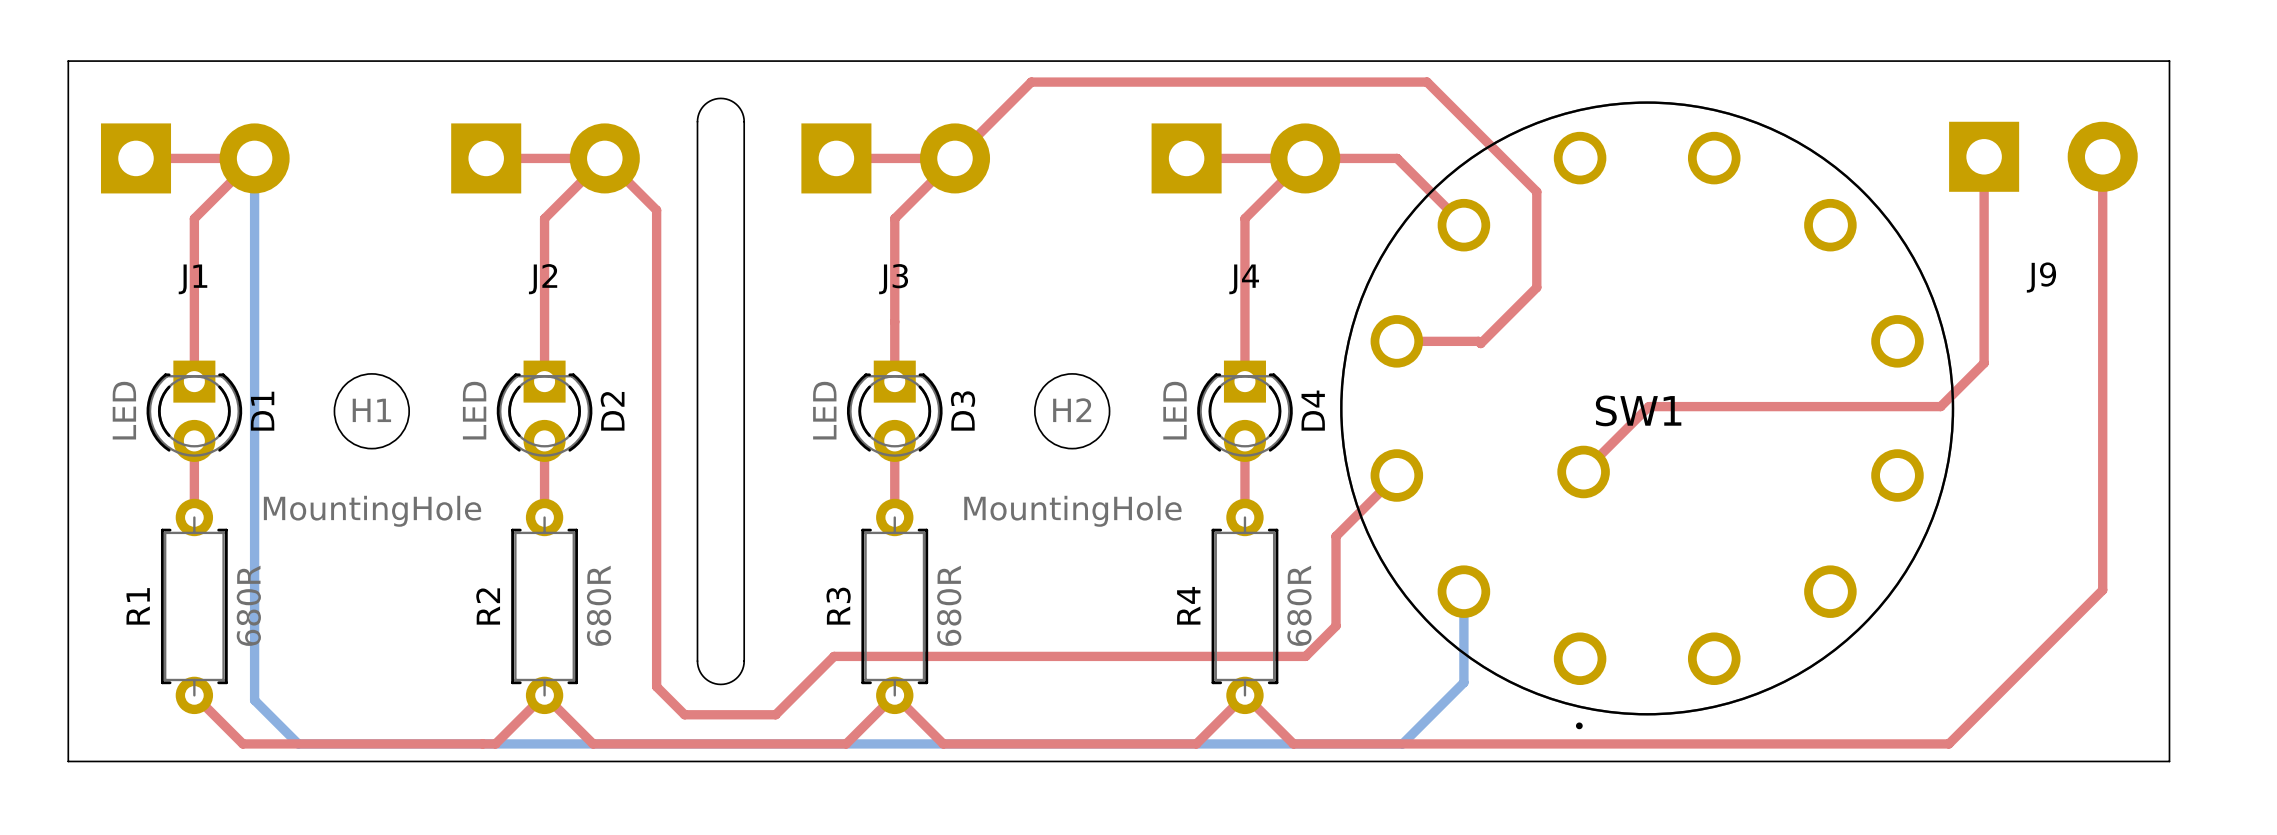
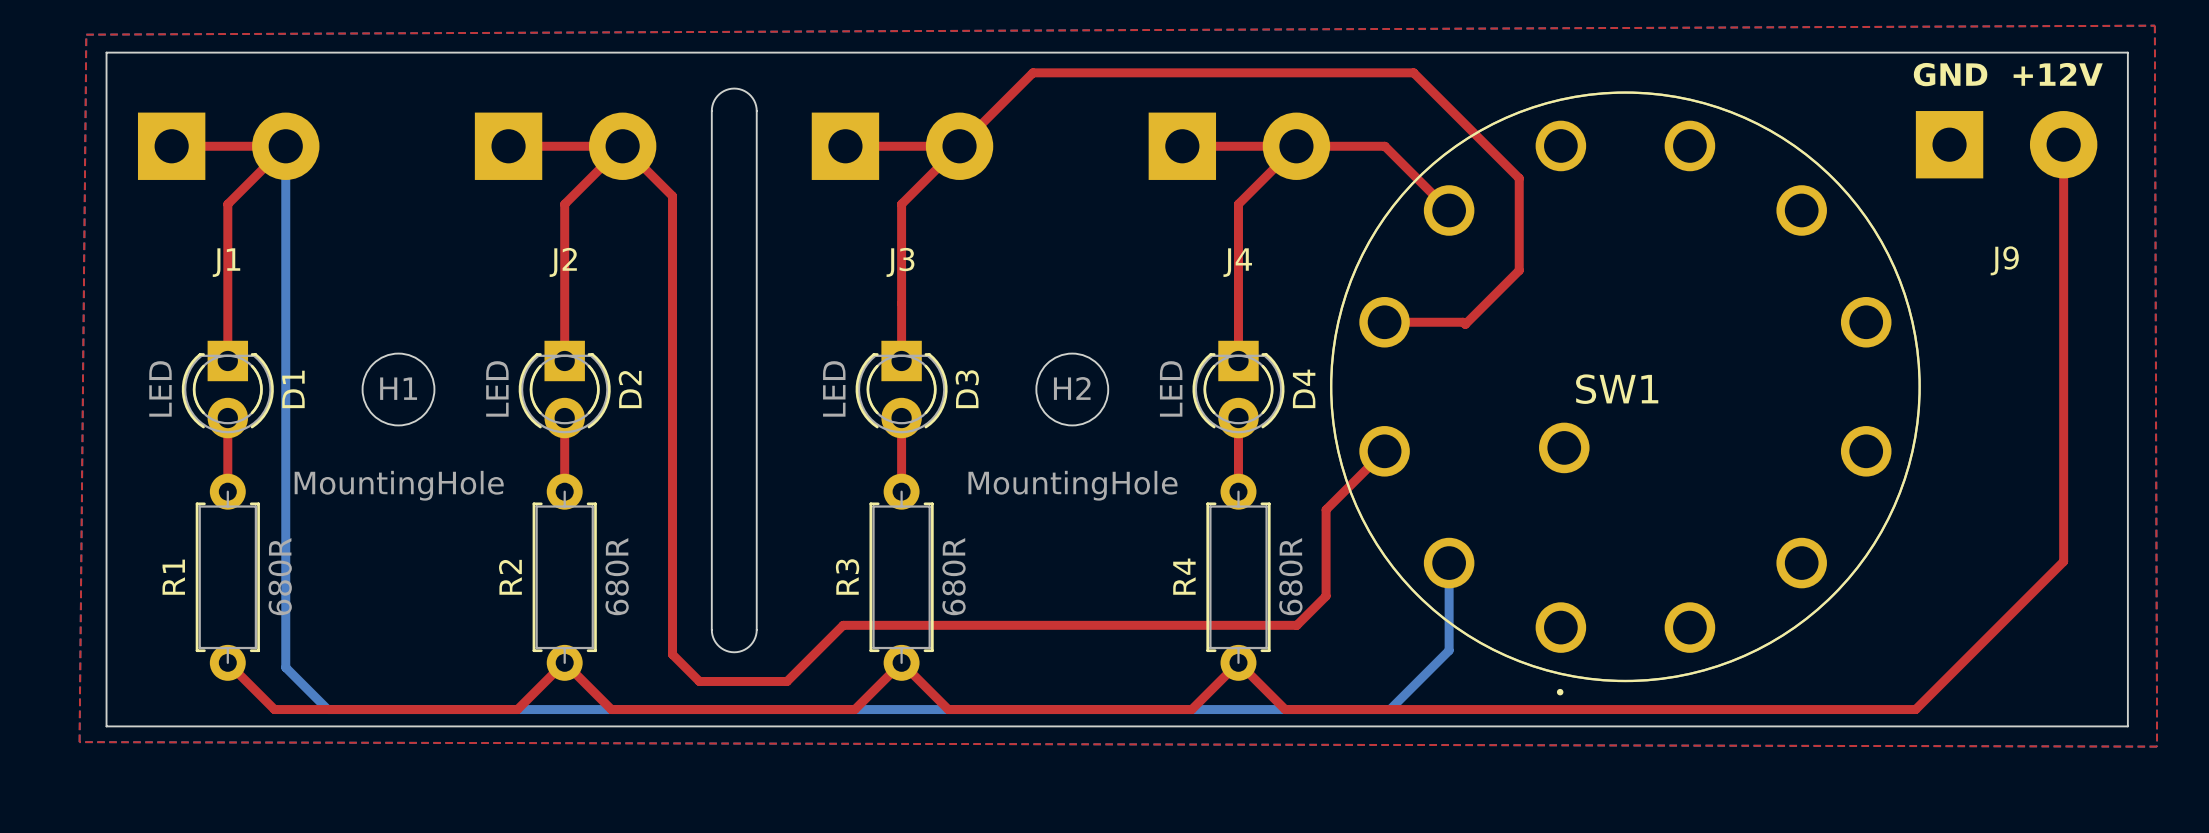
top zone outline: none -> (2154, 25) (86, 34) (79, 742) (2157, 746) (2154, 25)
text: none -> GND +12V (2008, 74)
top track: (1984, 156) (1984, 363) (1940, 406) (1648, 406) (1583, 471) -> none

